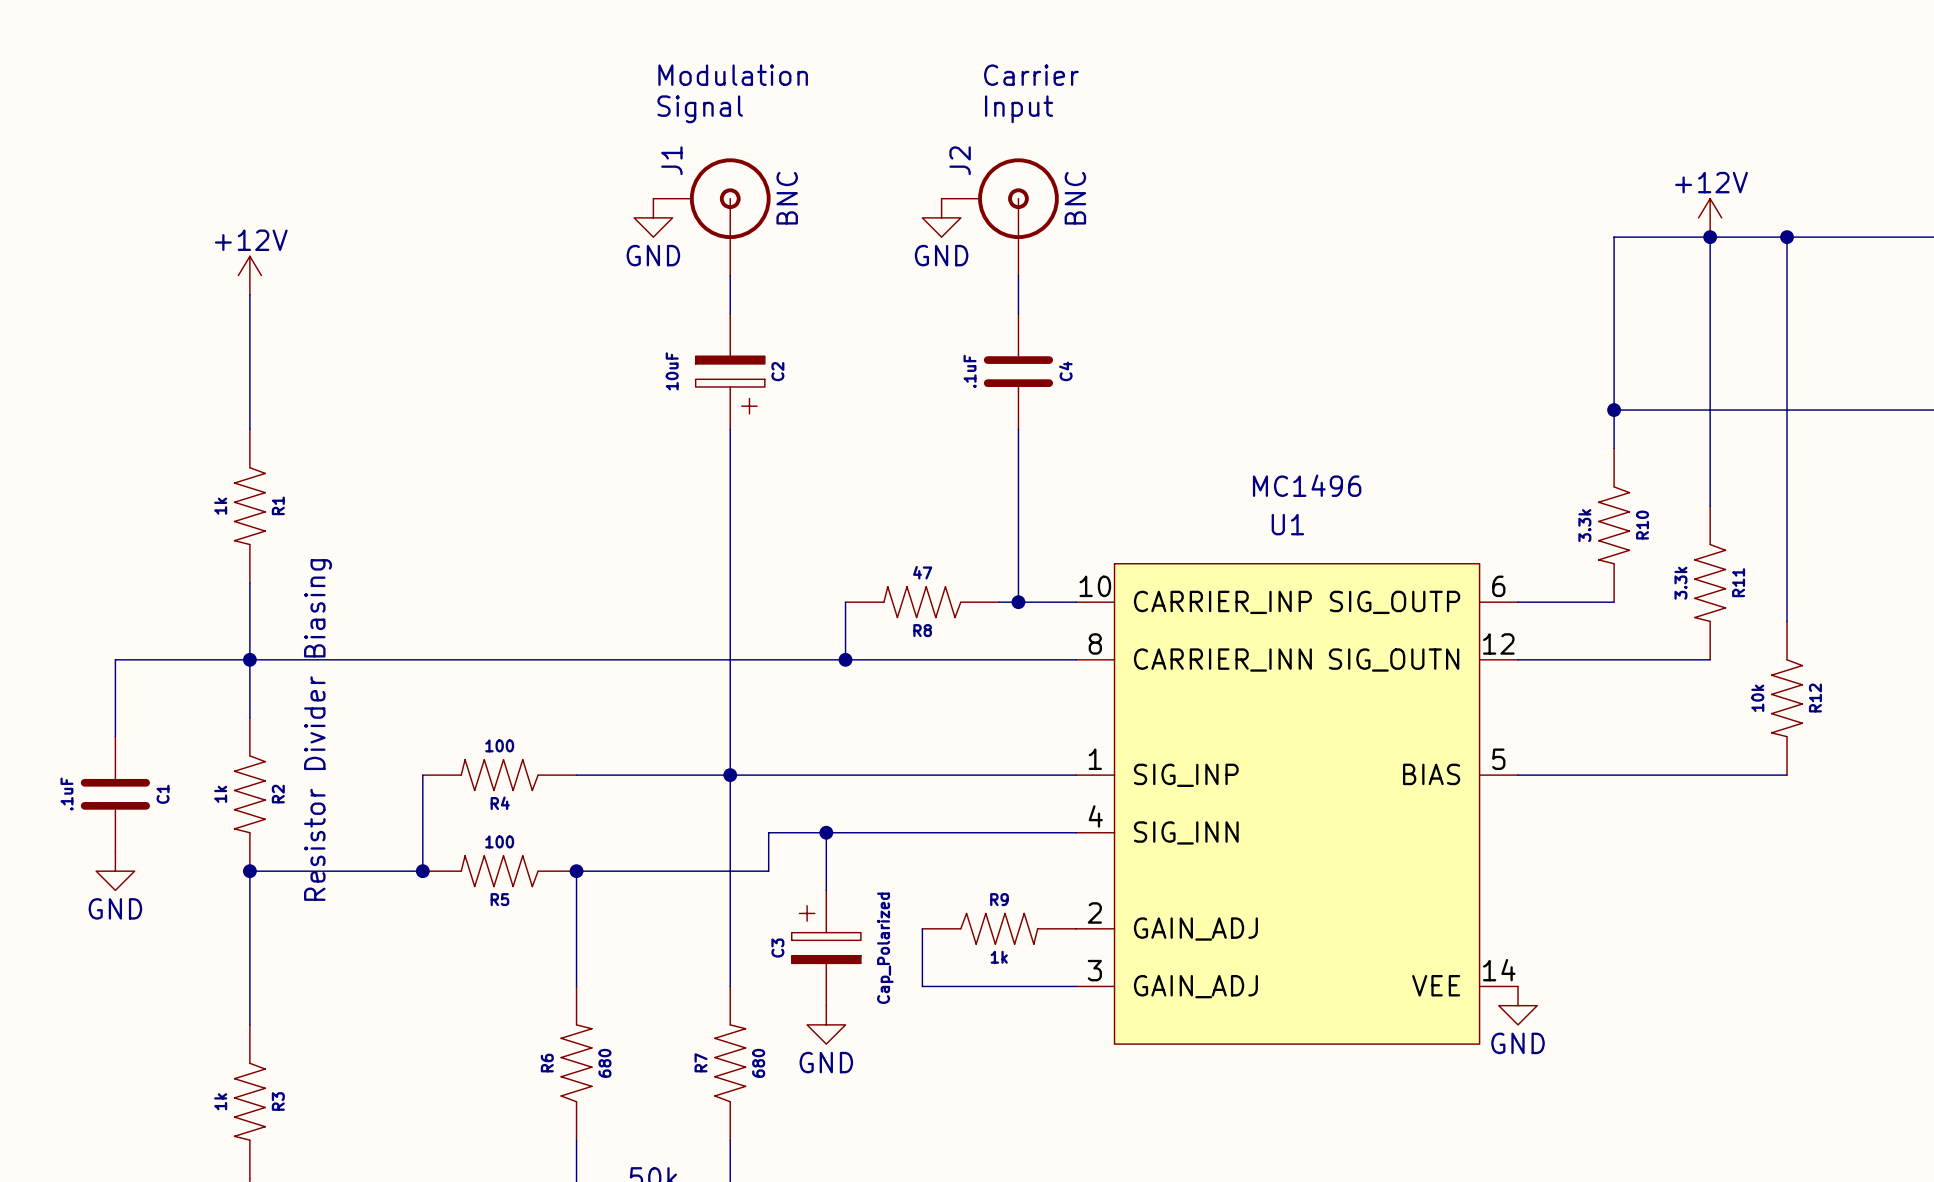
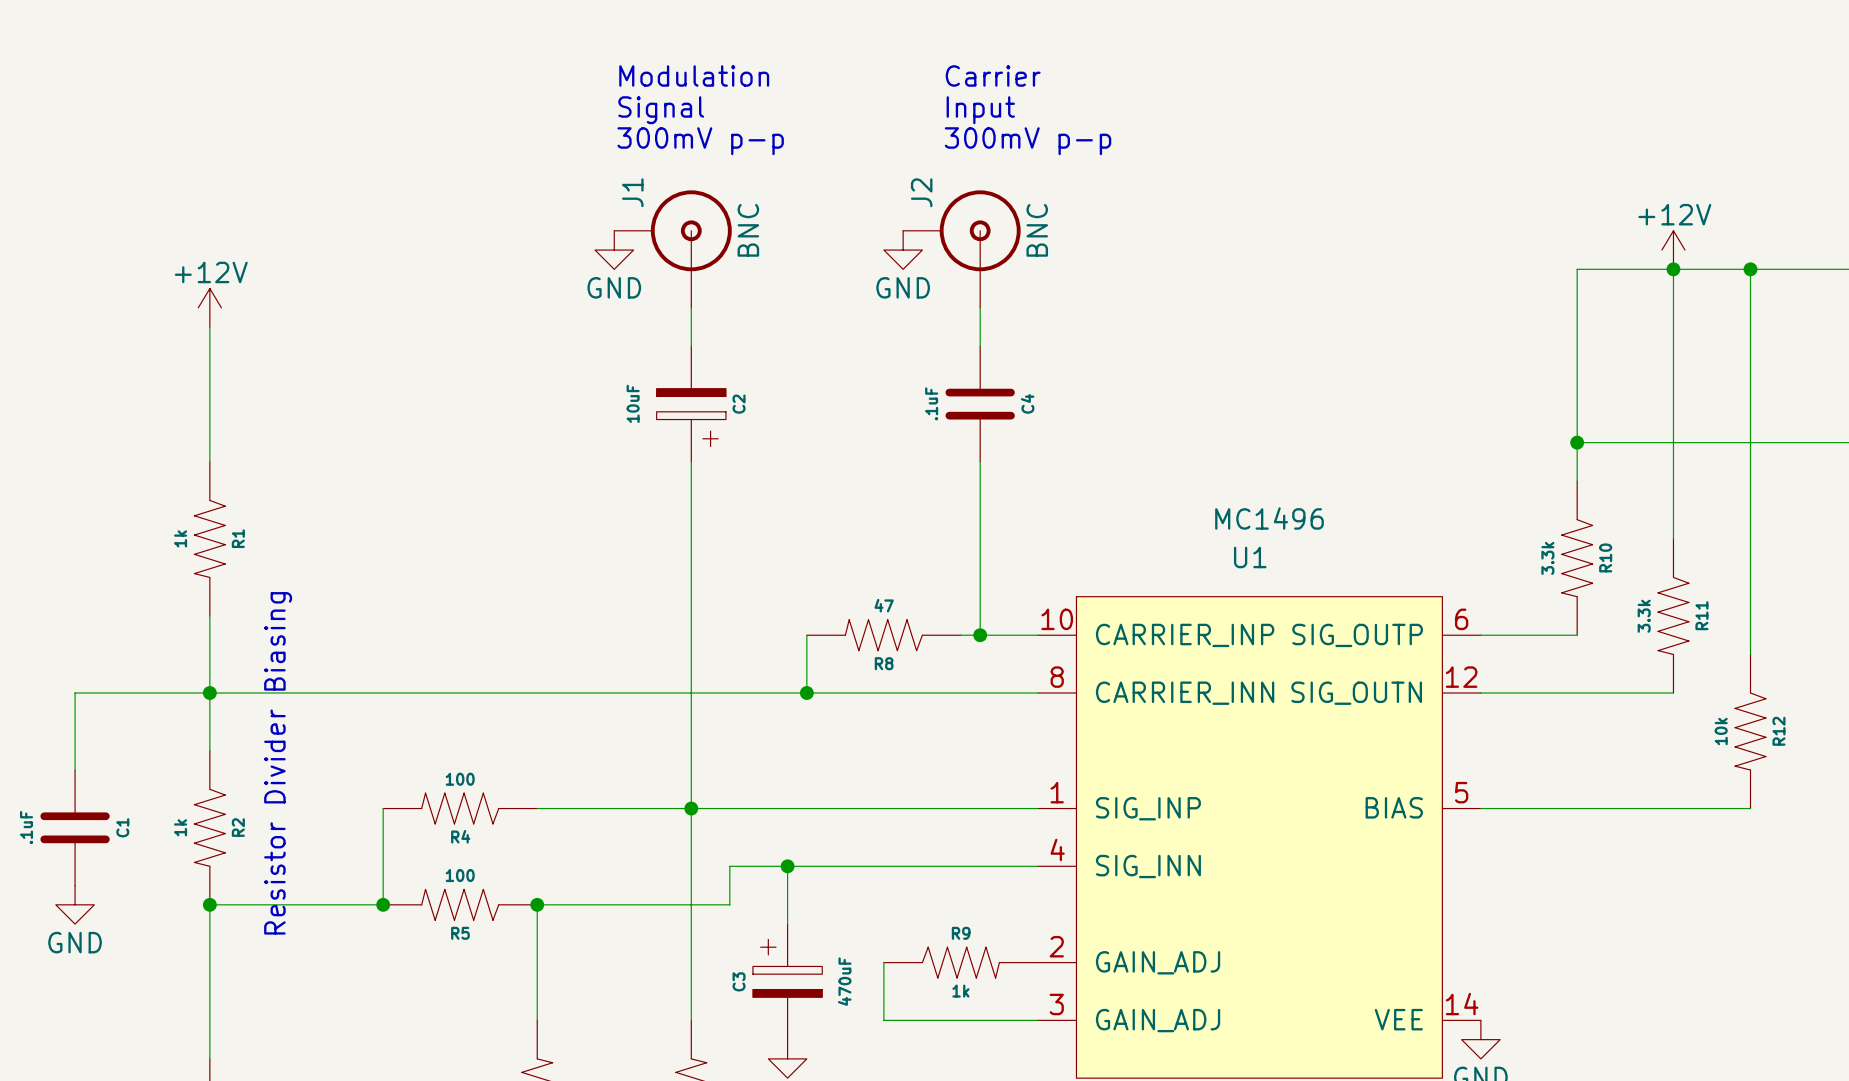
text: none -> Modulation (694, 75)
text: none -> Carrier (993, 75)
text: Modulation (733, 75) -> Signal (661, 110)
text: Carrier (1031, 75) -> Input (980, 110)
text: Signal (700, 109) -> 300mV p-p (700, 141)
text: Input (1019, 109) -> 300mV p-p (1028, 141)
C3 value: Cap_Polarized (885, 948) -> 470uF (844, 981)

